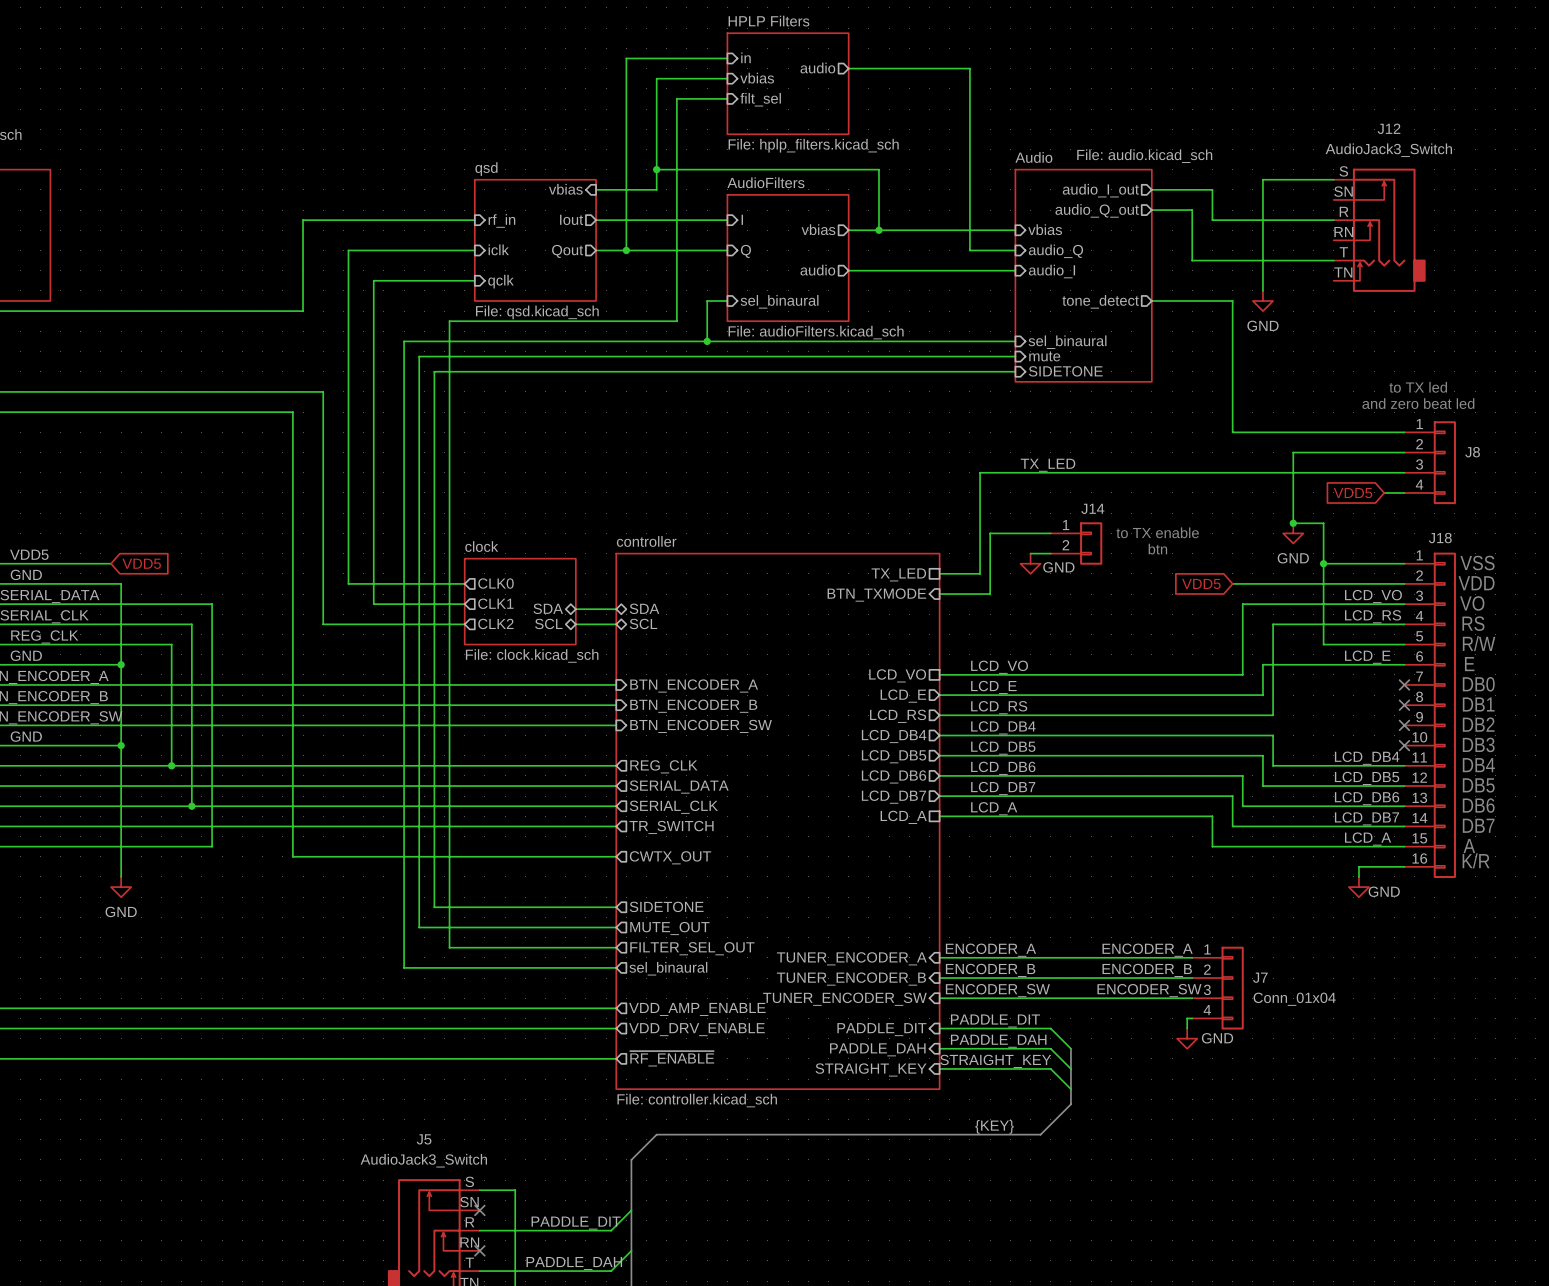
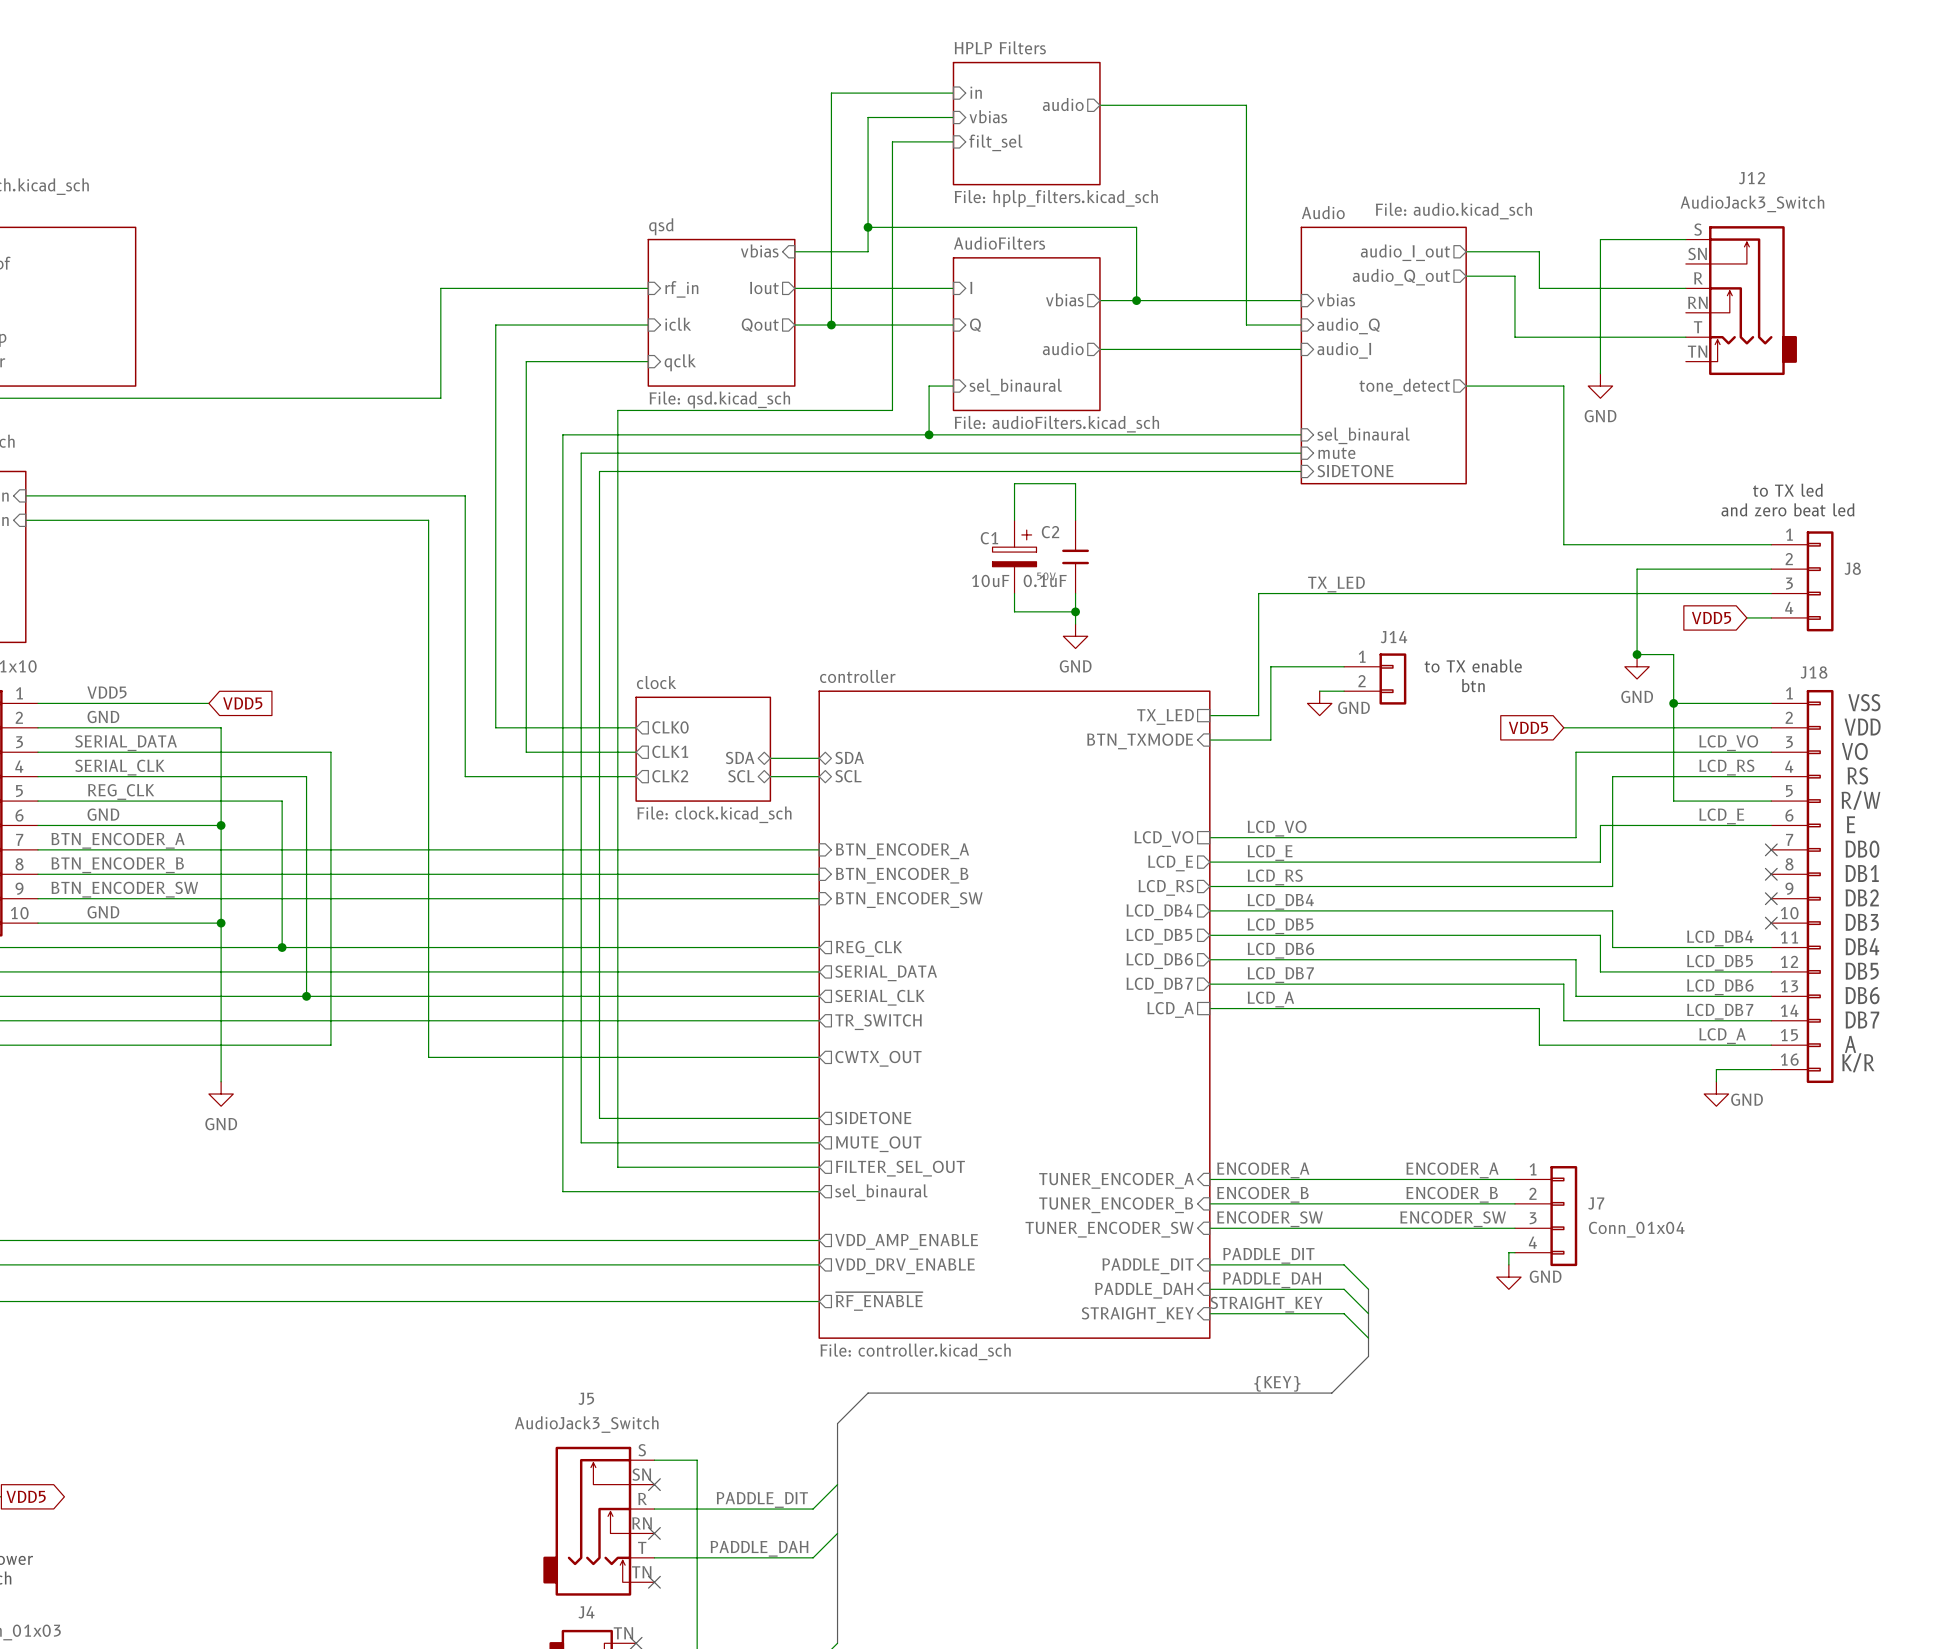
wire: none -> (1014, 520) (1014, 483) (1075, 483) (1075, 520)
C1: none -> 10uF (1014, 556)
C2: none -> 0.1uF (1075, 556)
wire: none -> (1014, 593) (1014, 611) (1075, 611)
wire: none -> (1075, 593) (1075, 624)
junction: none -> (1075, 611)
power symbol: none -> GND (1075, 636)

